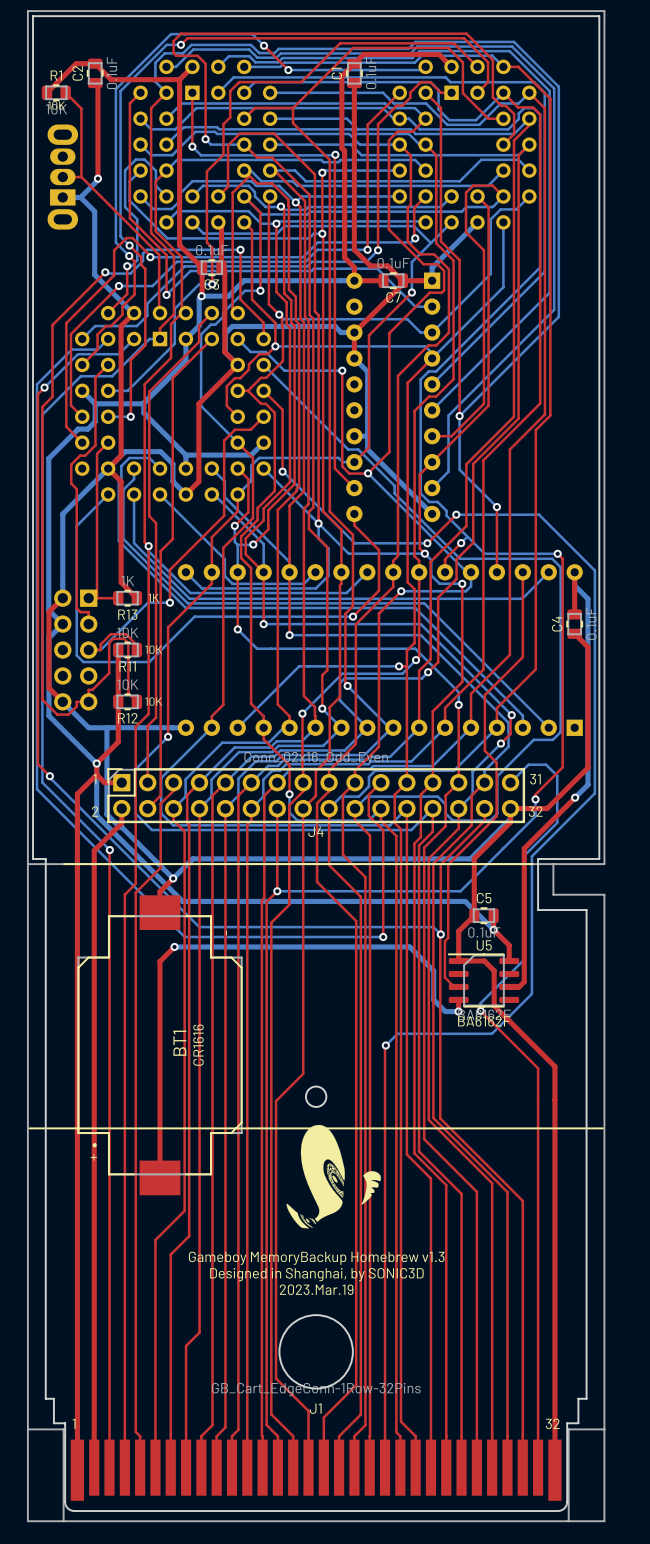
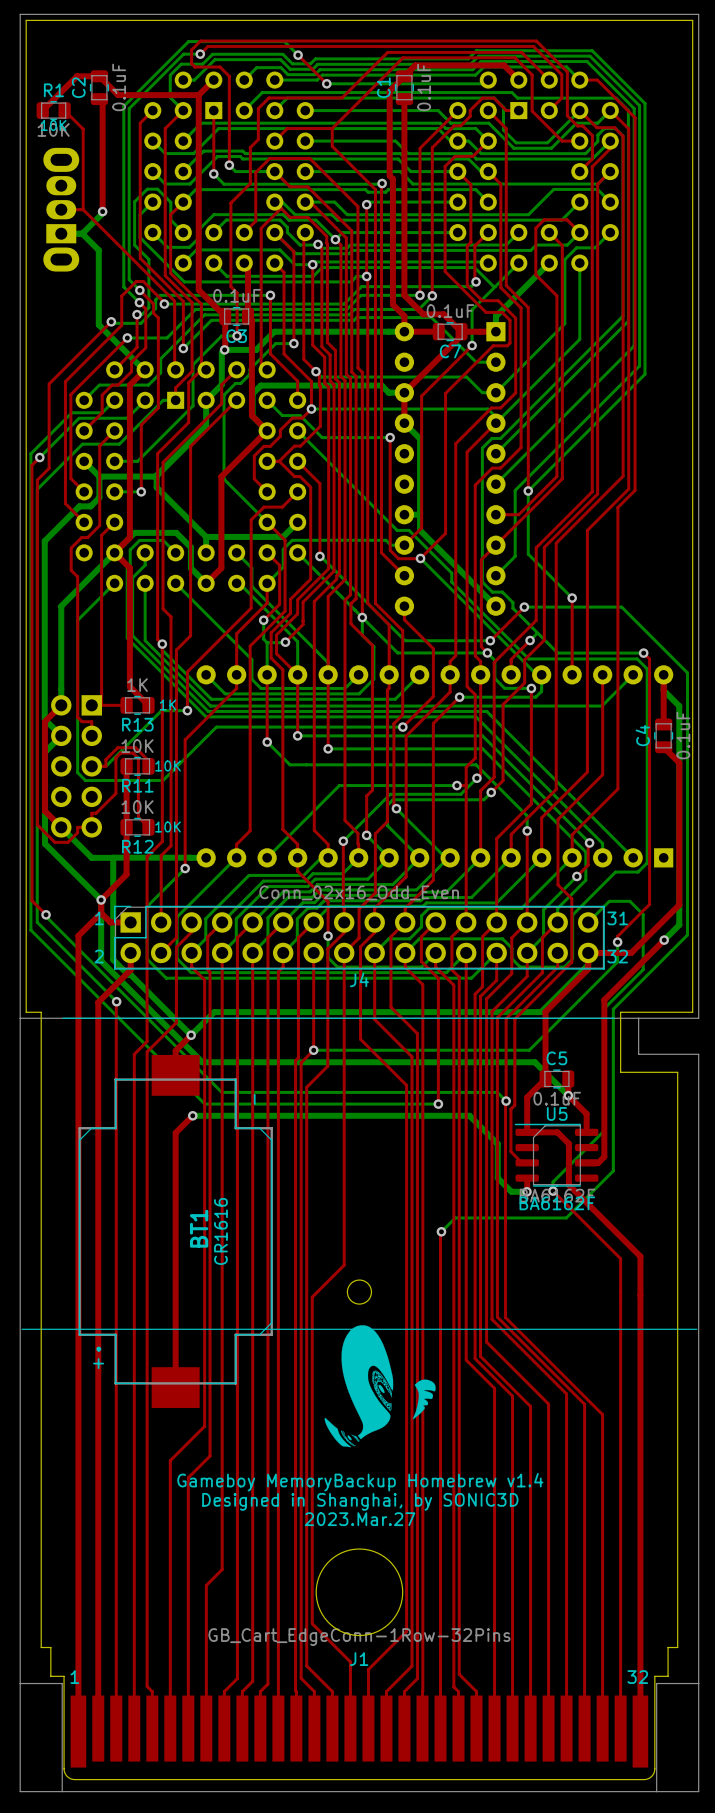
text: Gameboy MemoryBackup Homebrew v1.3 (316, 1258) -> Gameboy MemoryBackup Homebrew v1.4 (360, 1482)
text: 2023.Mar.19 (316, 1289) -> 2023.Mar.27 (360, 1519)

